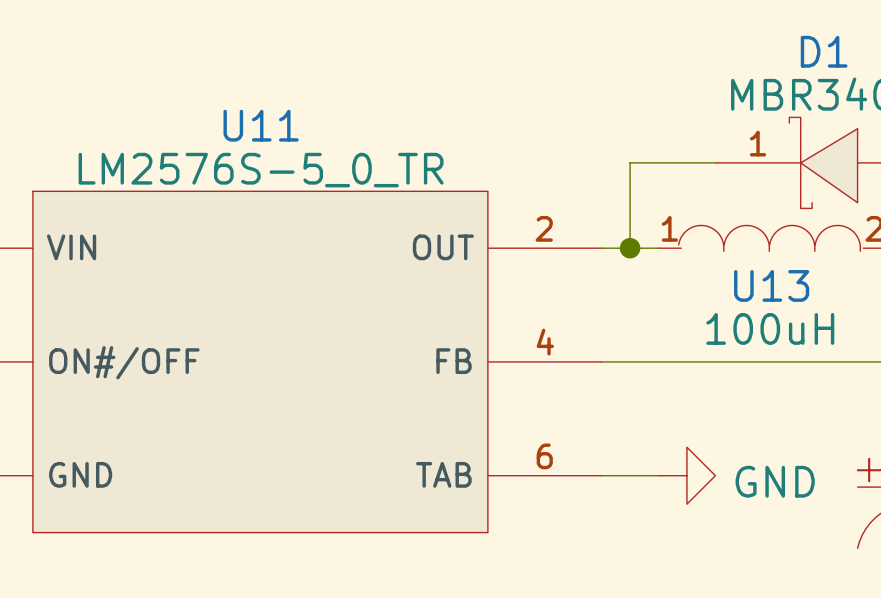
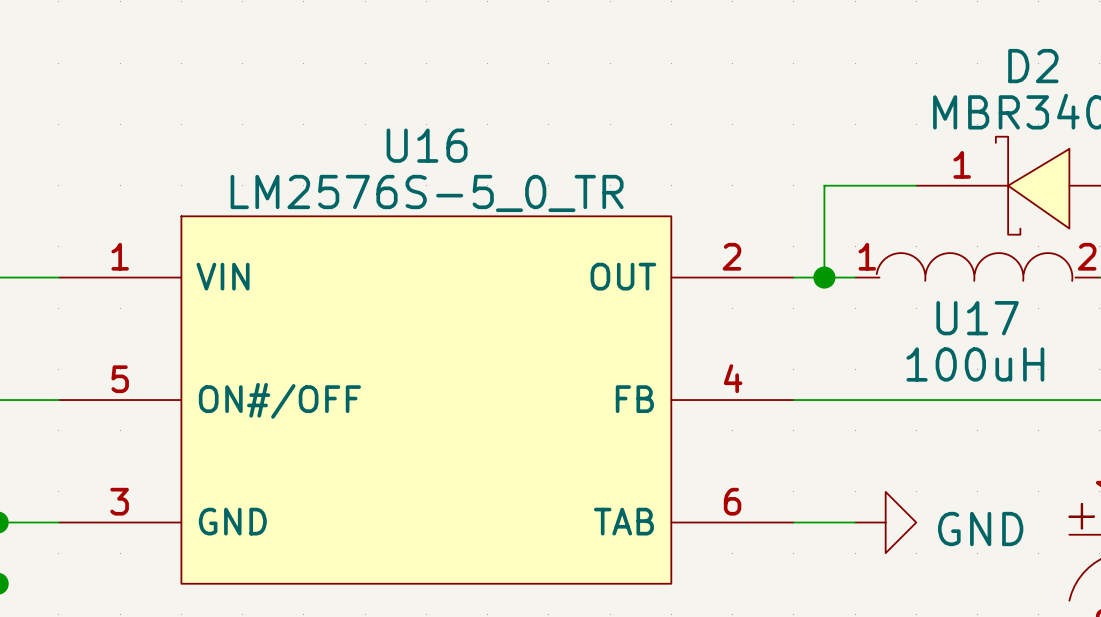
D1 name: D1 (824, 51) -> D2 (1033, 66)
U11 name: U11 (261, 125) -> U16 (427, 145)
U13 name: U13 (771, 285) -> U17 (977, 318)

